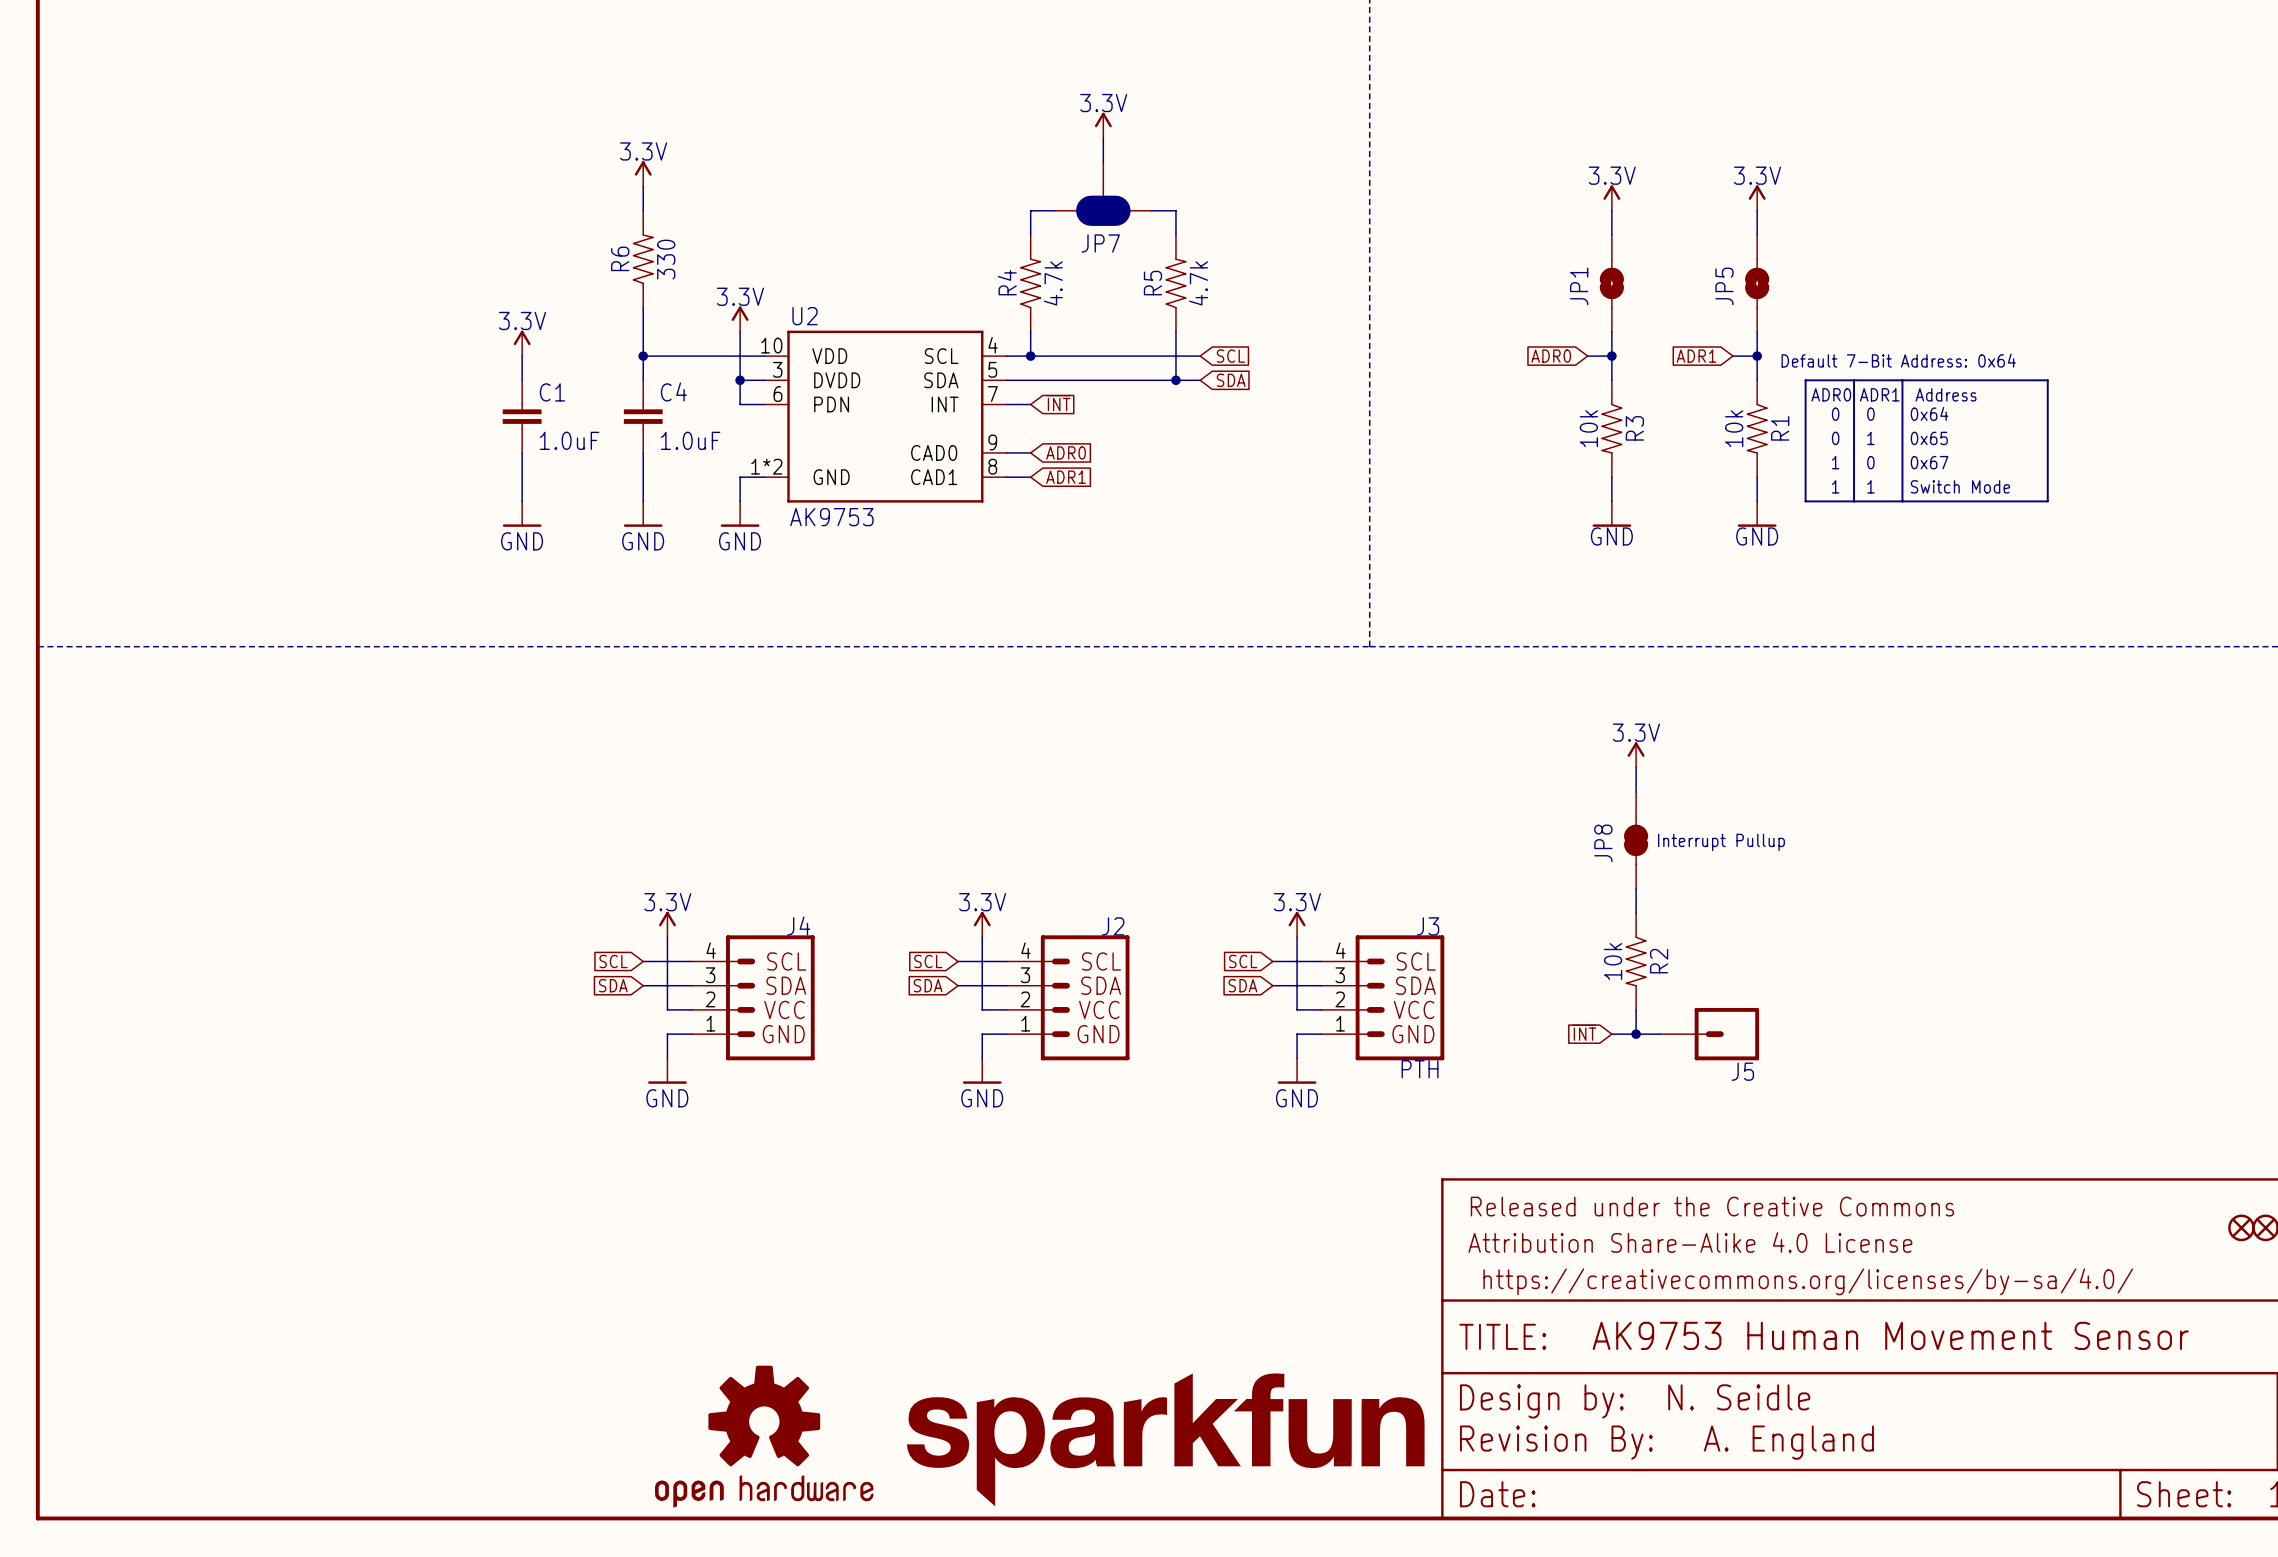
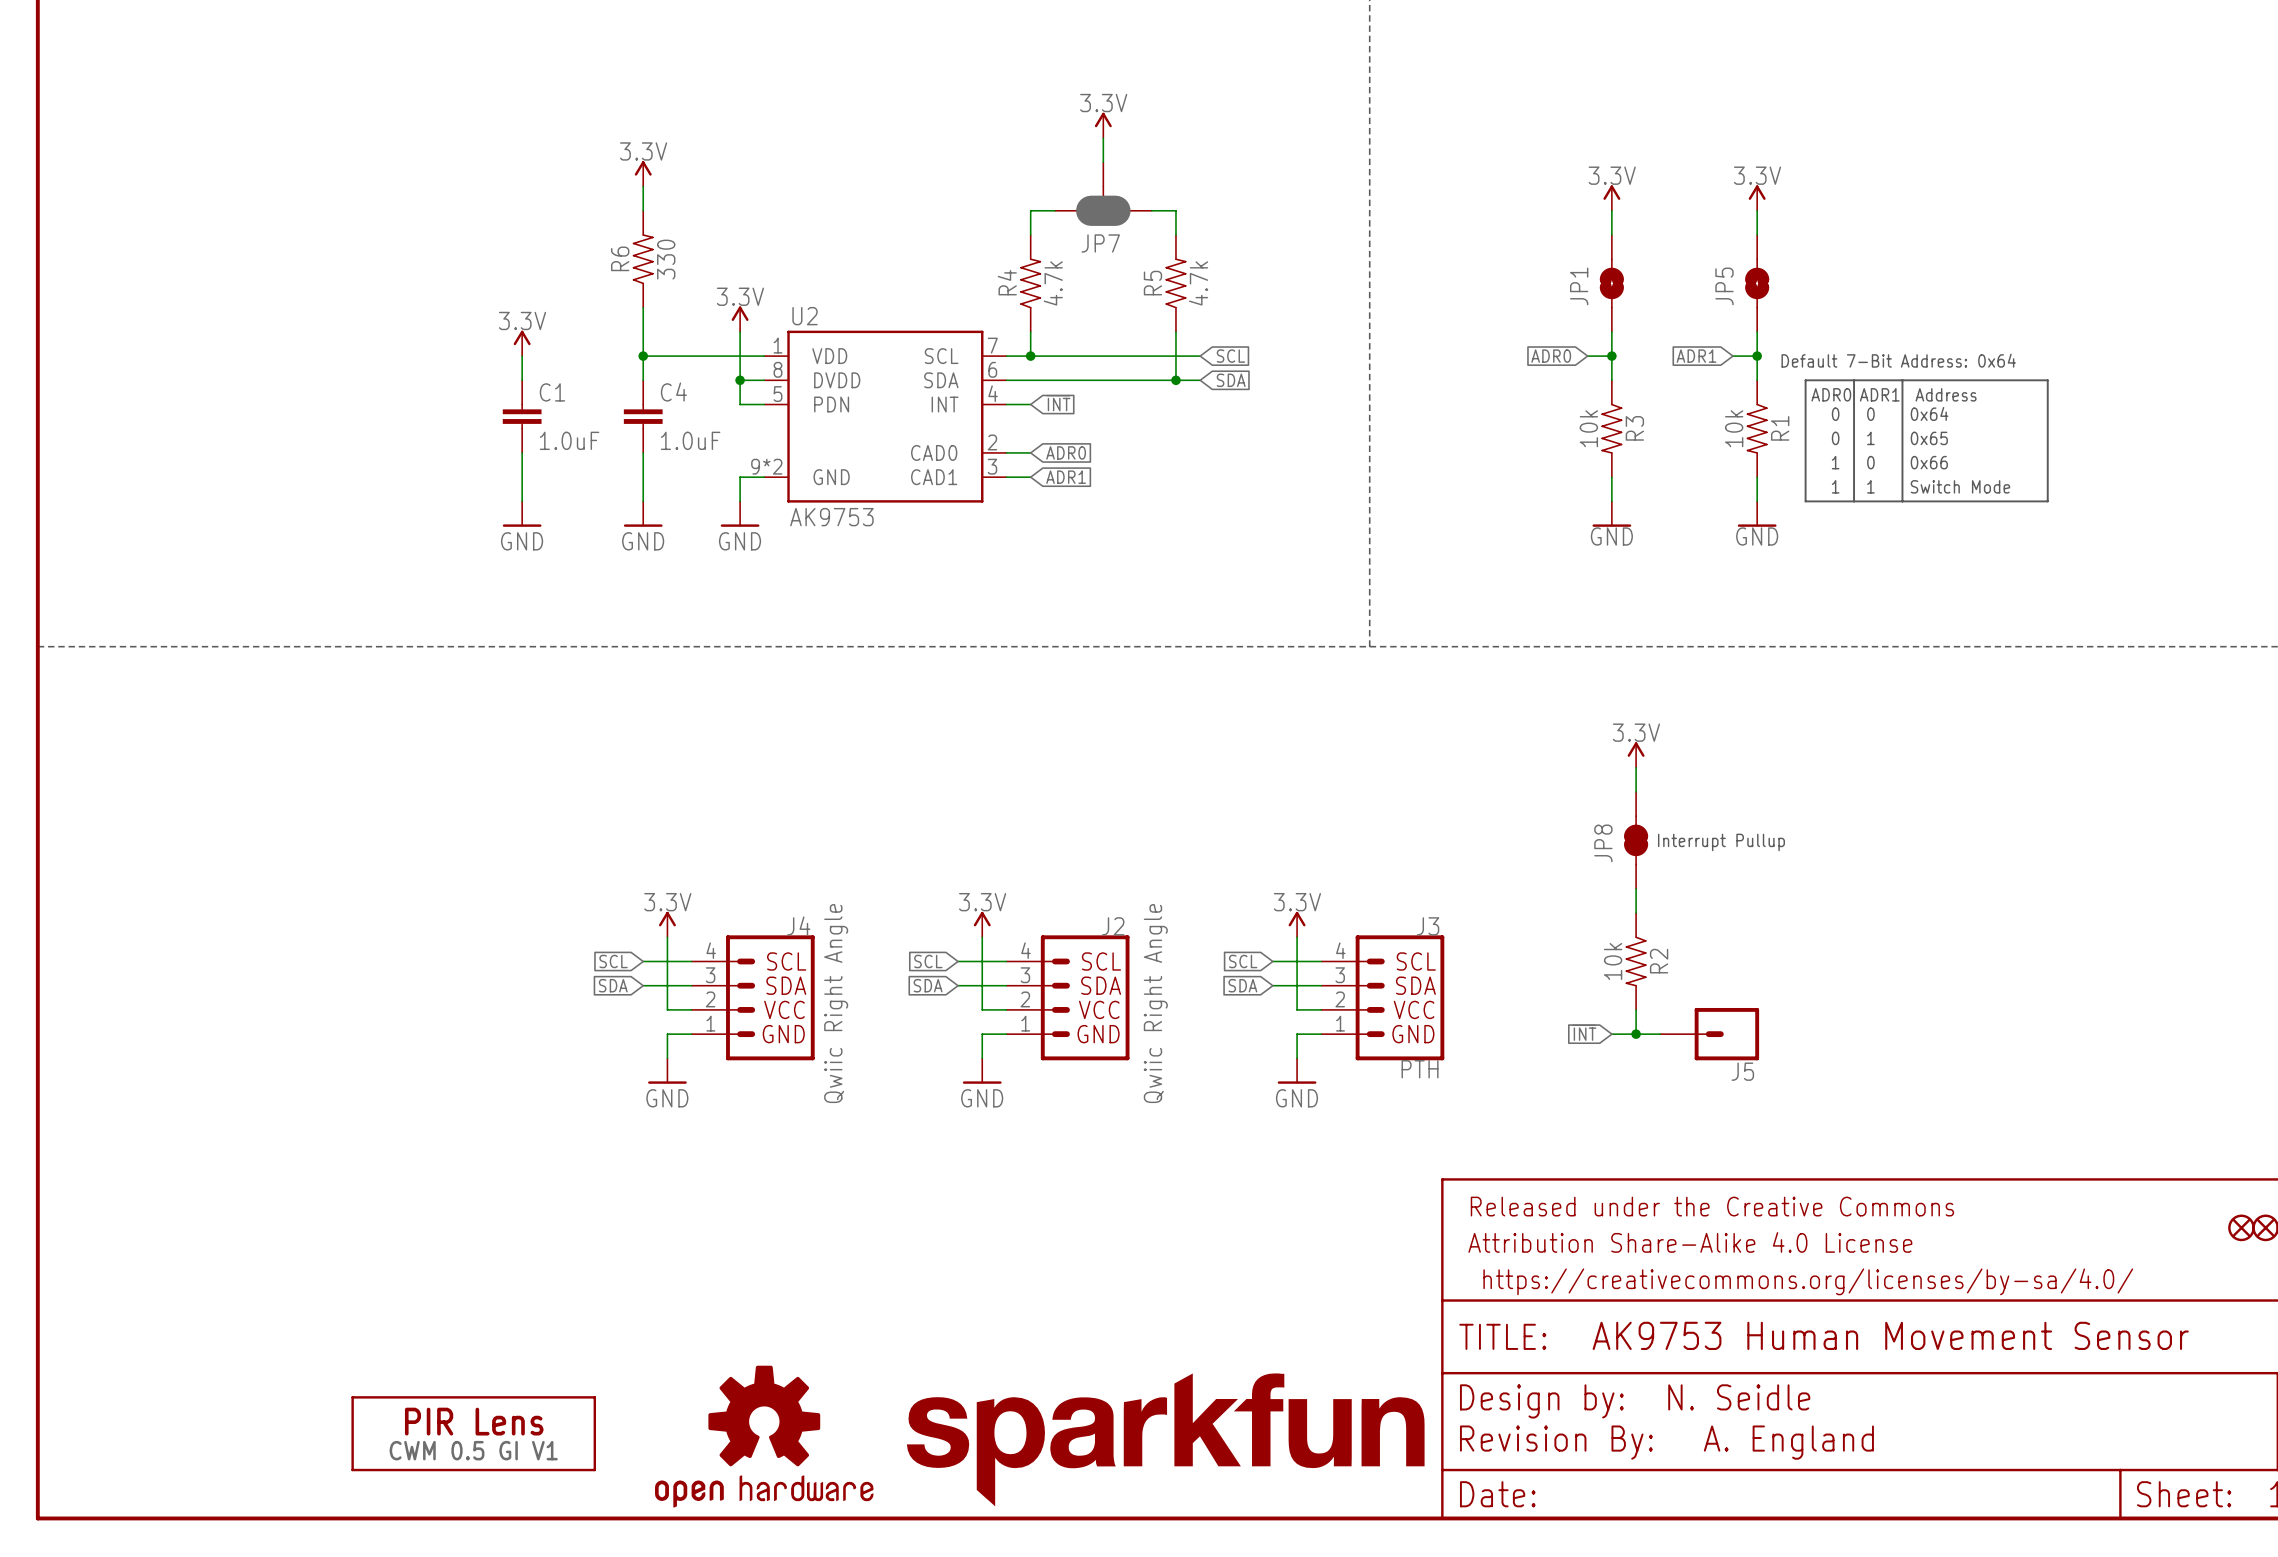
U2 symbol: [764, 330, 1007, 503] -> [764, 330, 1007, 503]
text: 1 0 0x67 (1890, 462) -> 1 0 0x66 (1889, 462)
J4 value: none -> Qwiic Right Angle (836, 1003)
J2 value: none -> Qwiic Right Angle (1155, 1003)
part: none -> CWM 0.5 GI V1 (473, 1433)

